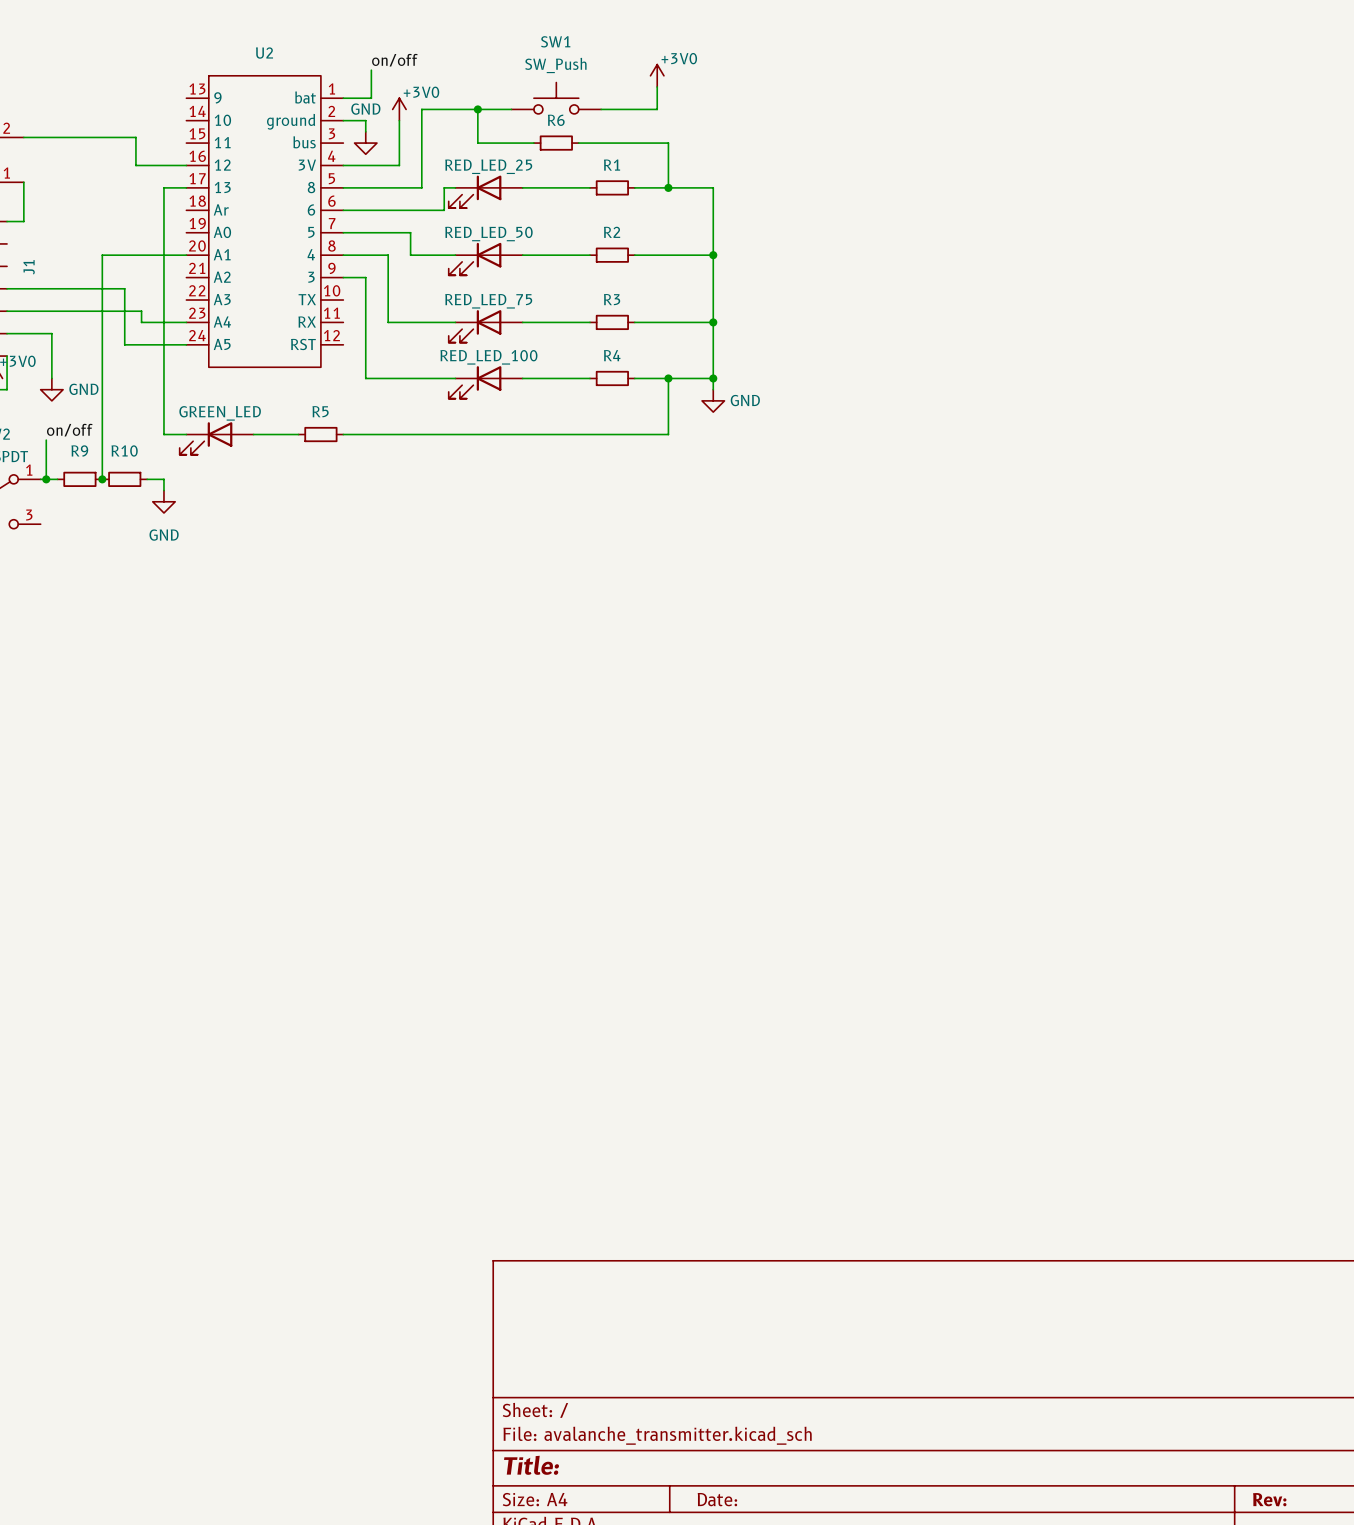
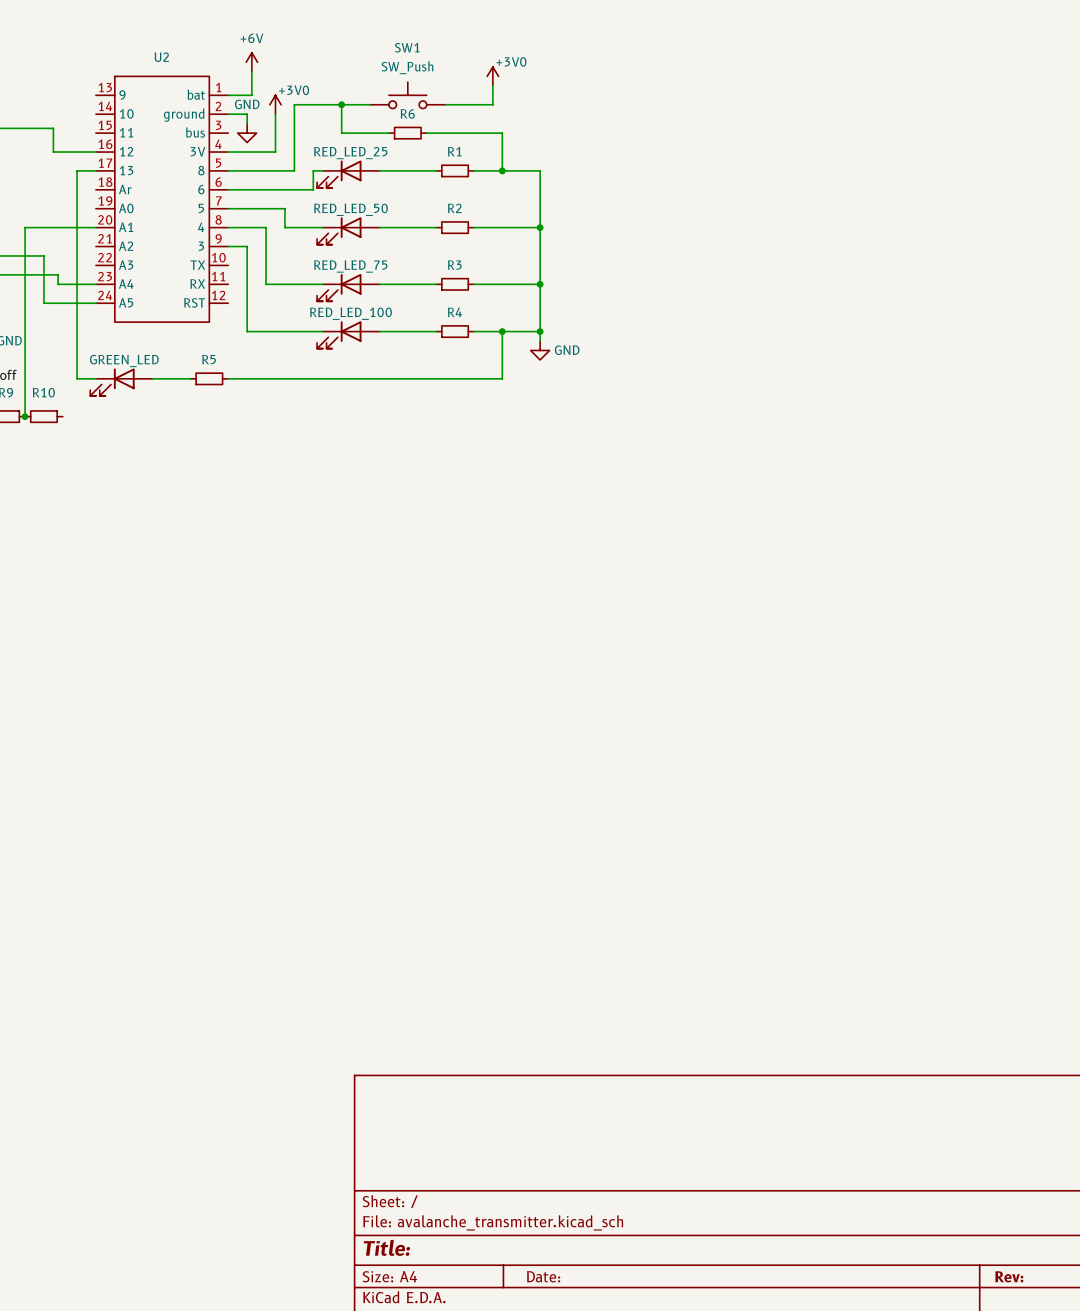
power symbol: none -> +6V (251, 62)
label: on/off (394, 60) -> none
wire: (147, 479) (163, 479) (163, 490) -> none
power symbol: GND (163, 501) -> none

